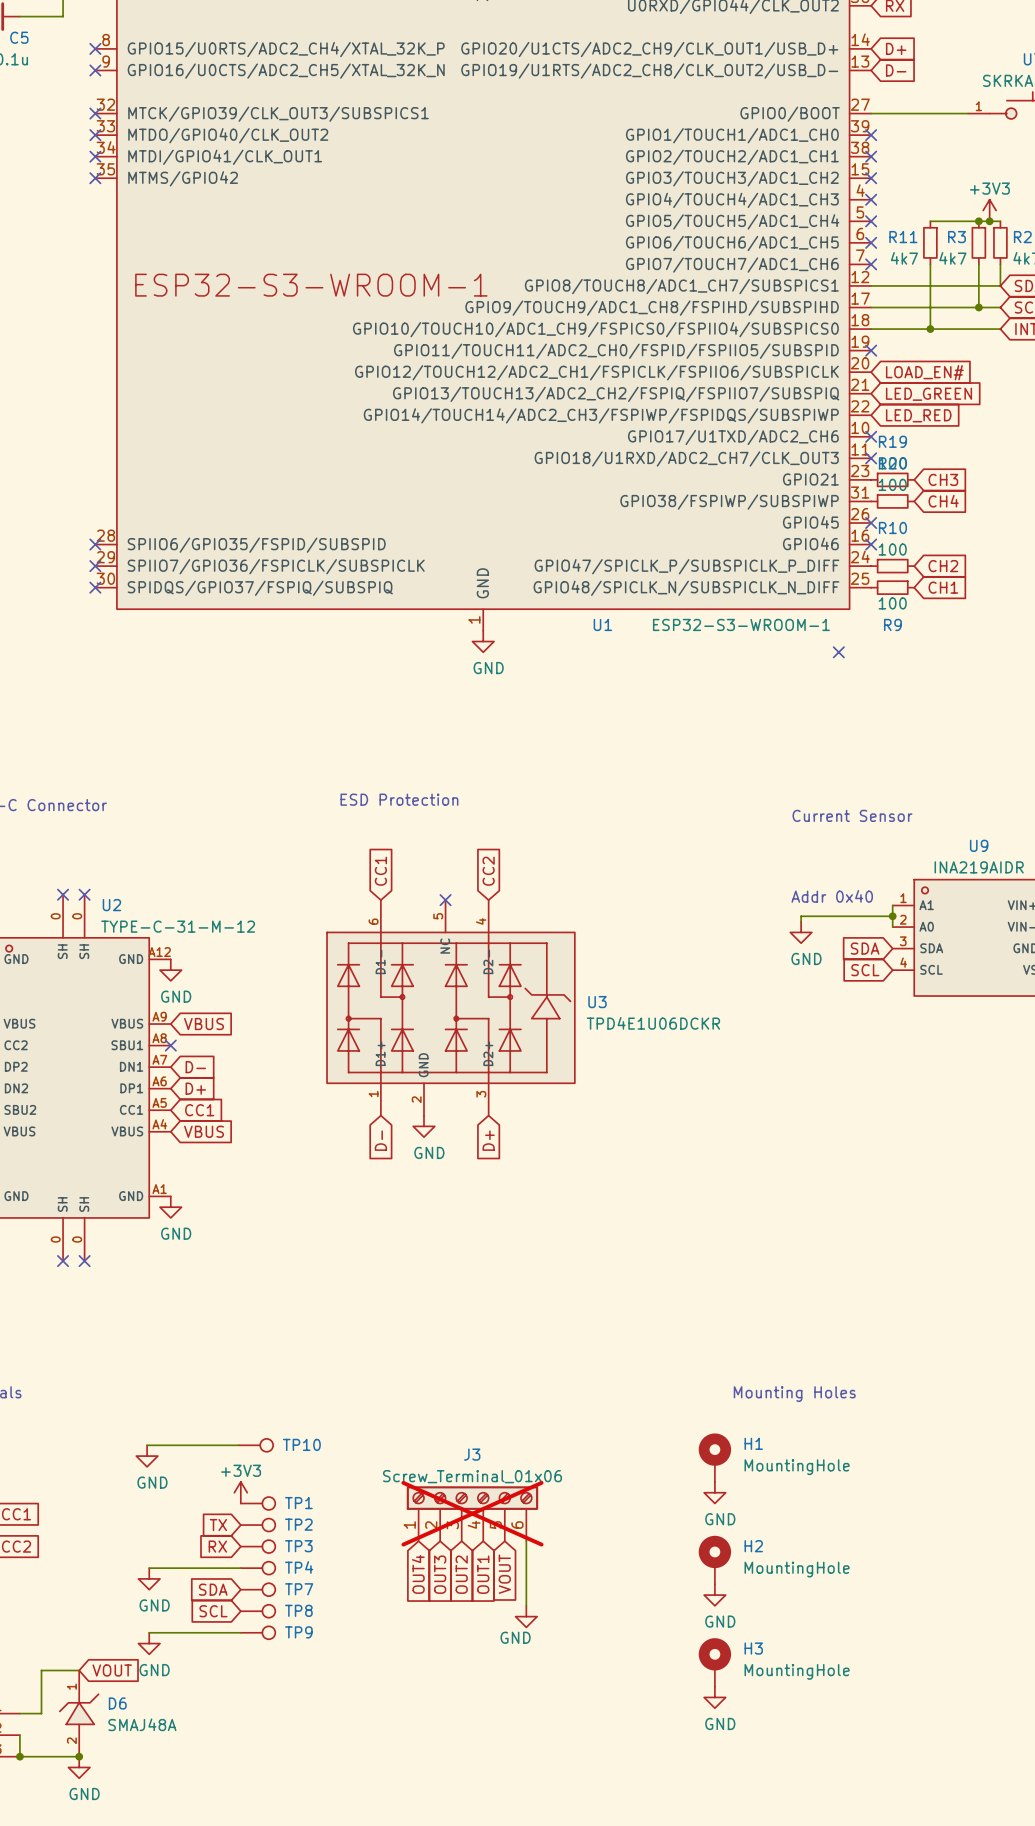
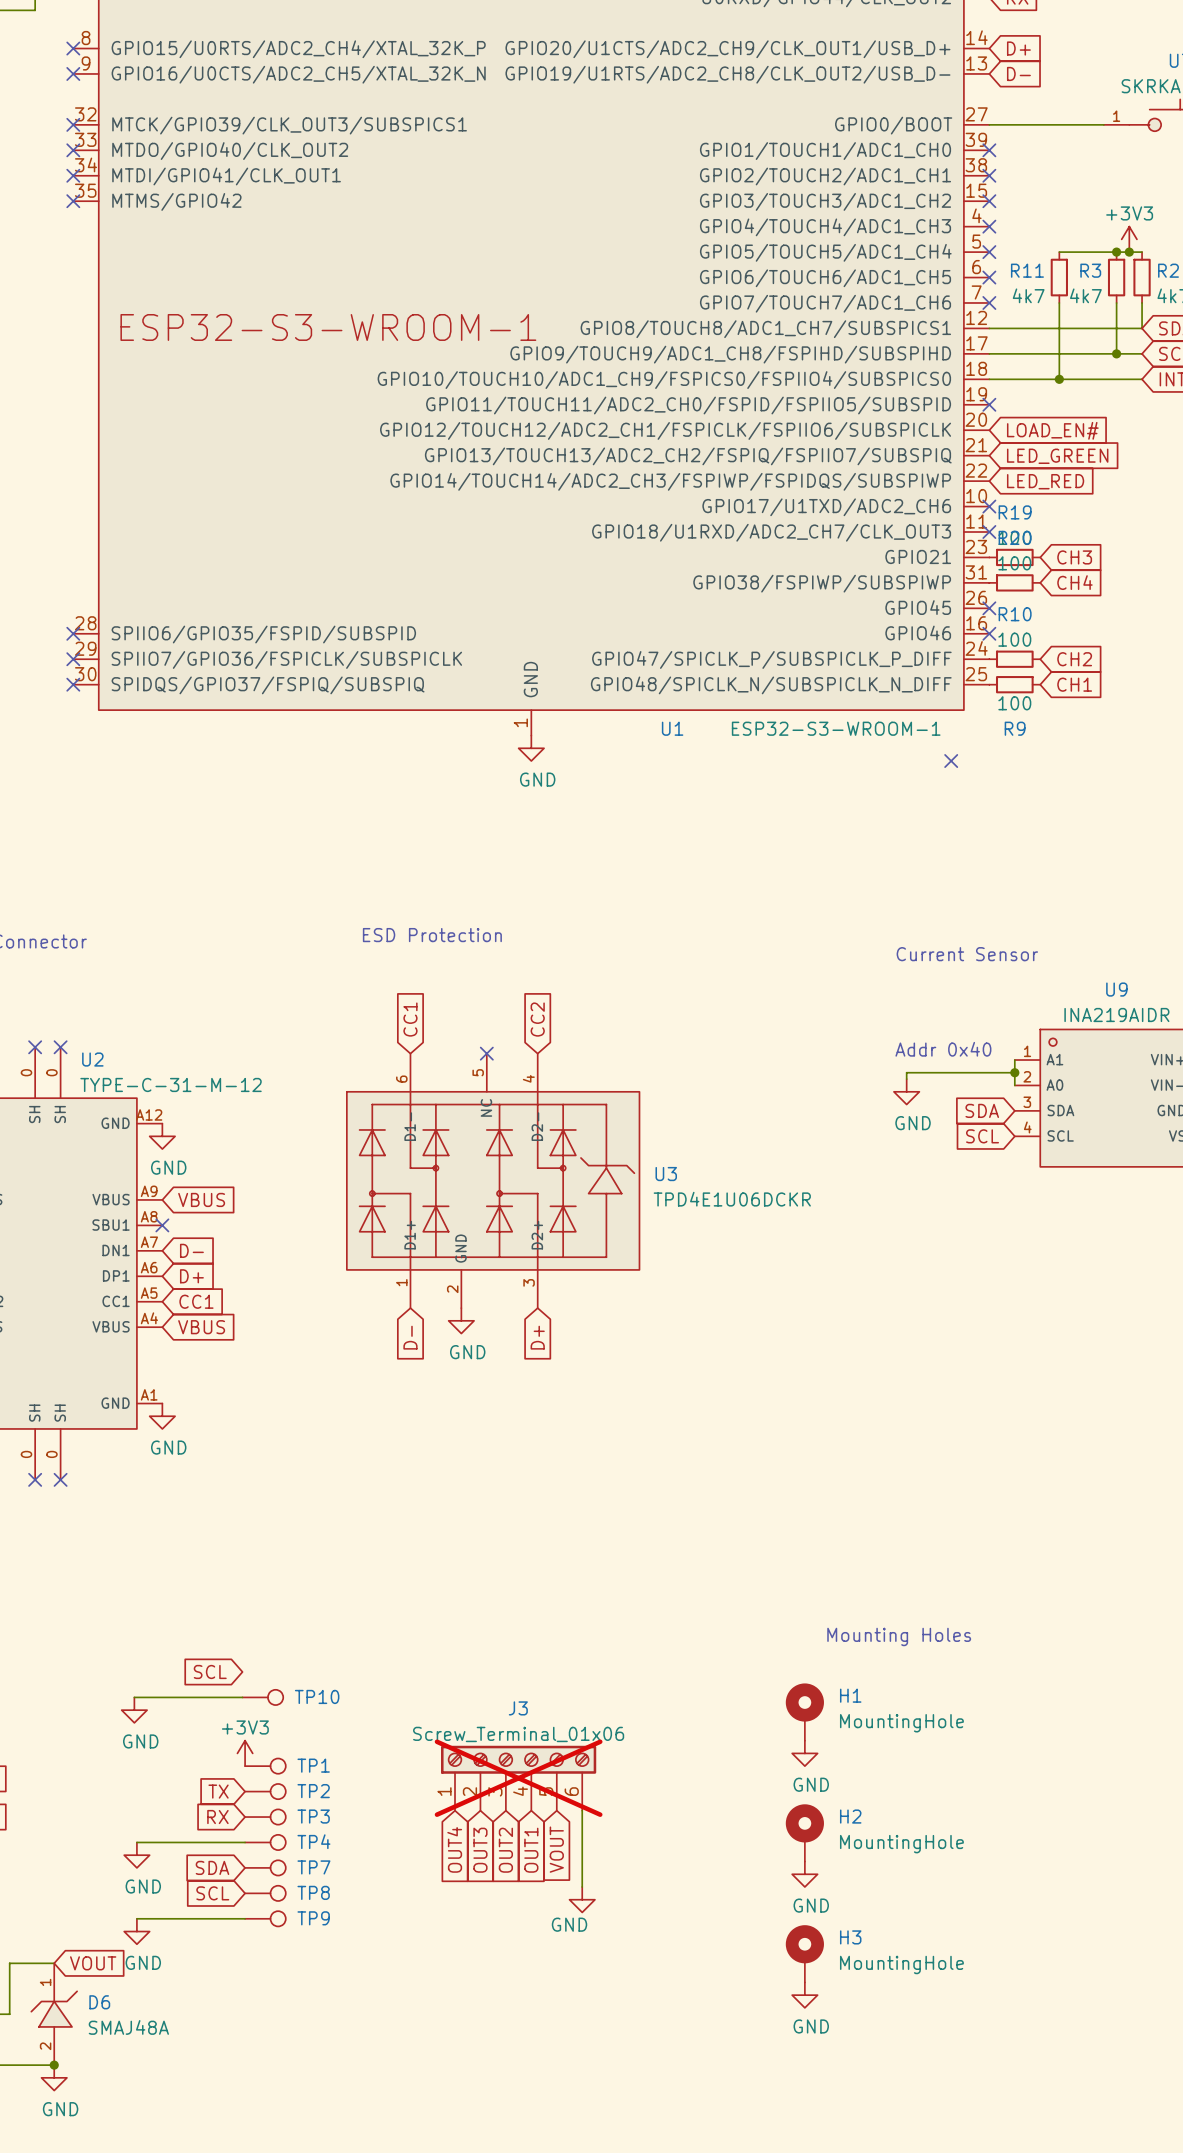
global label: none -> SCL (210, 1671)

